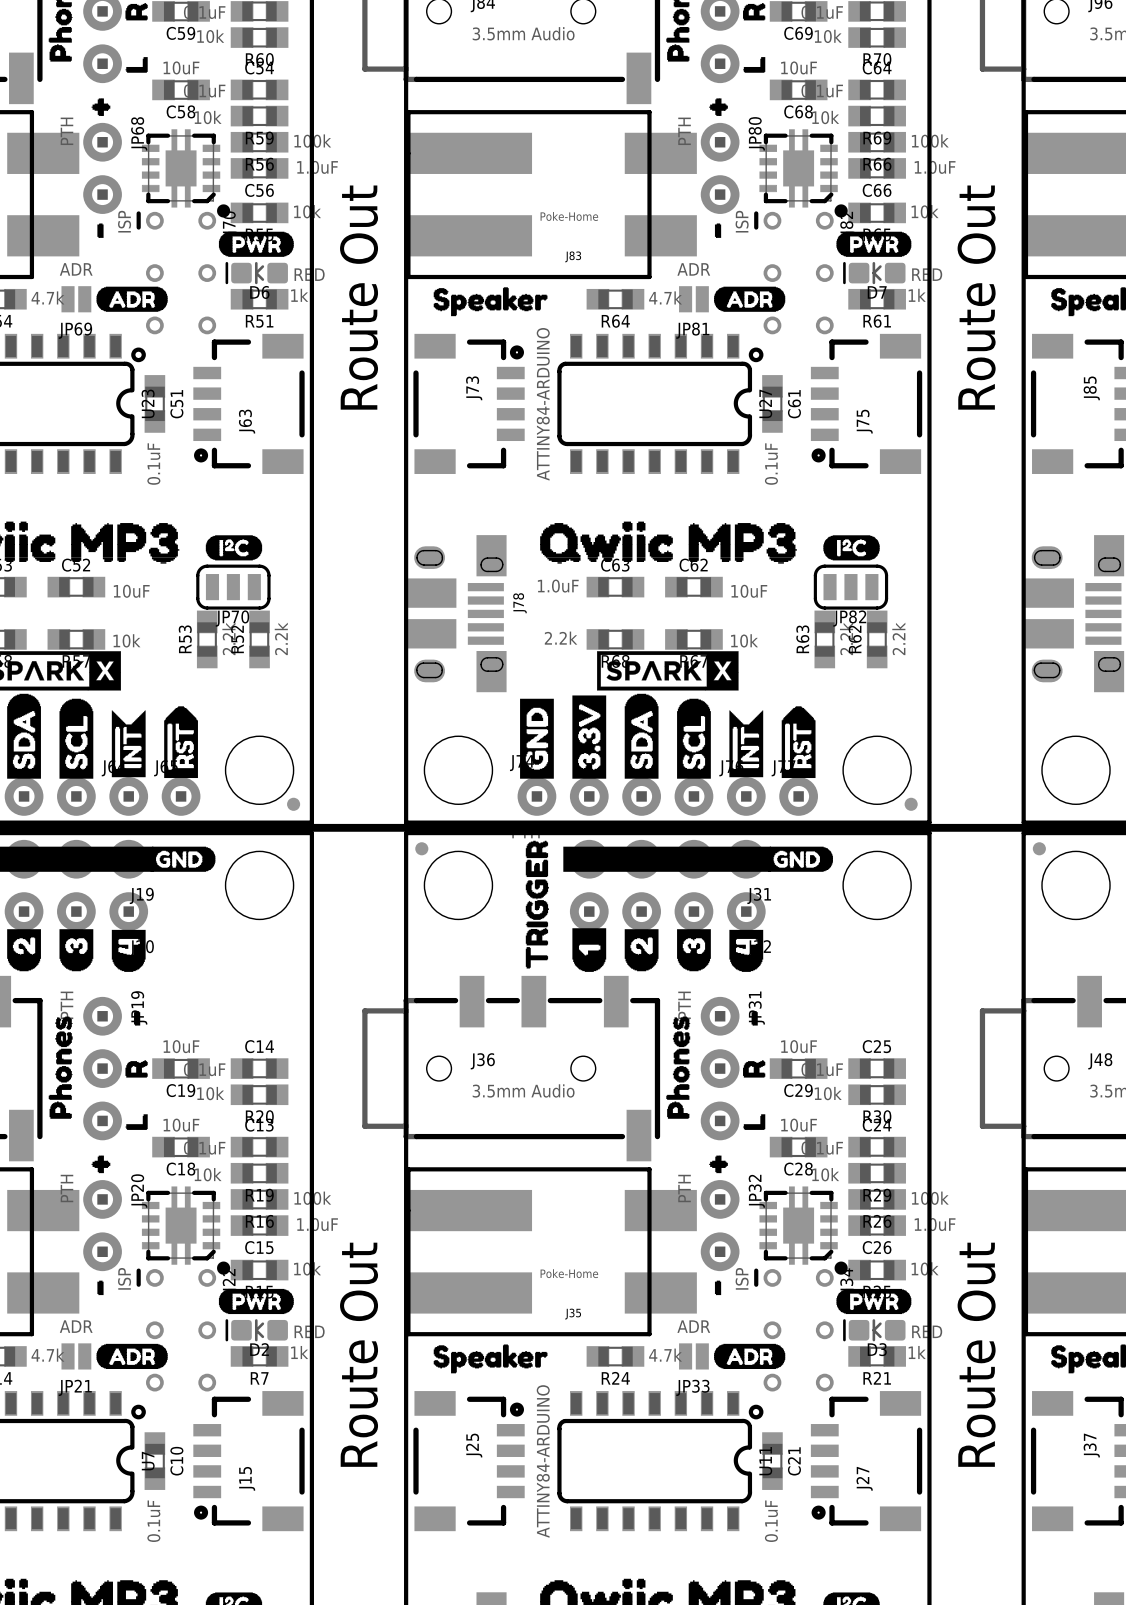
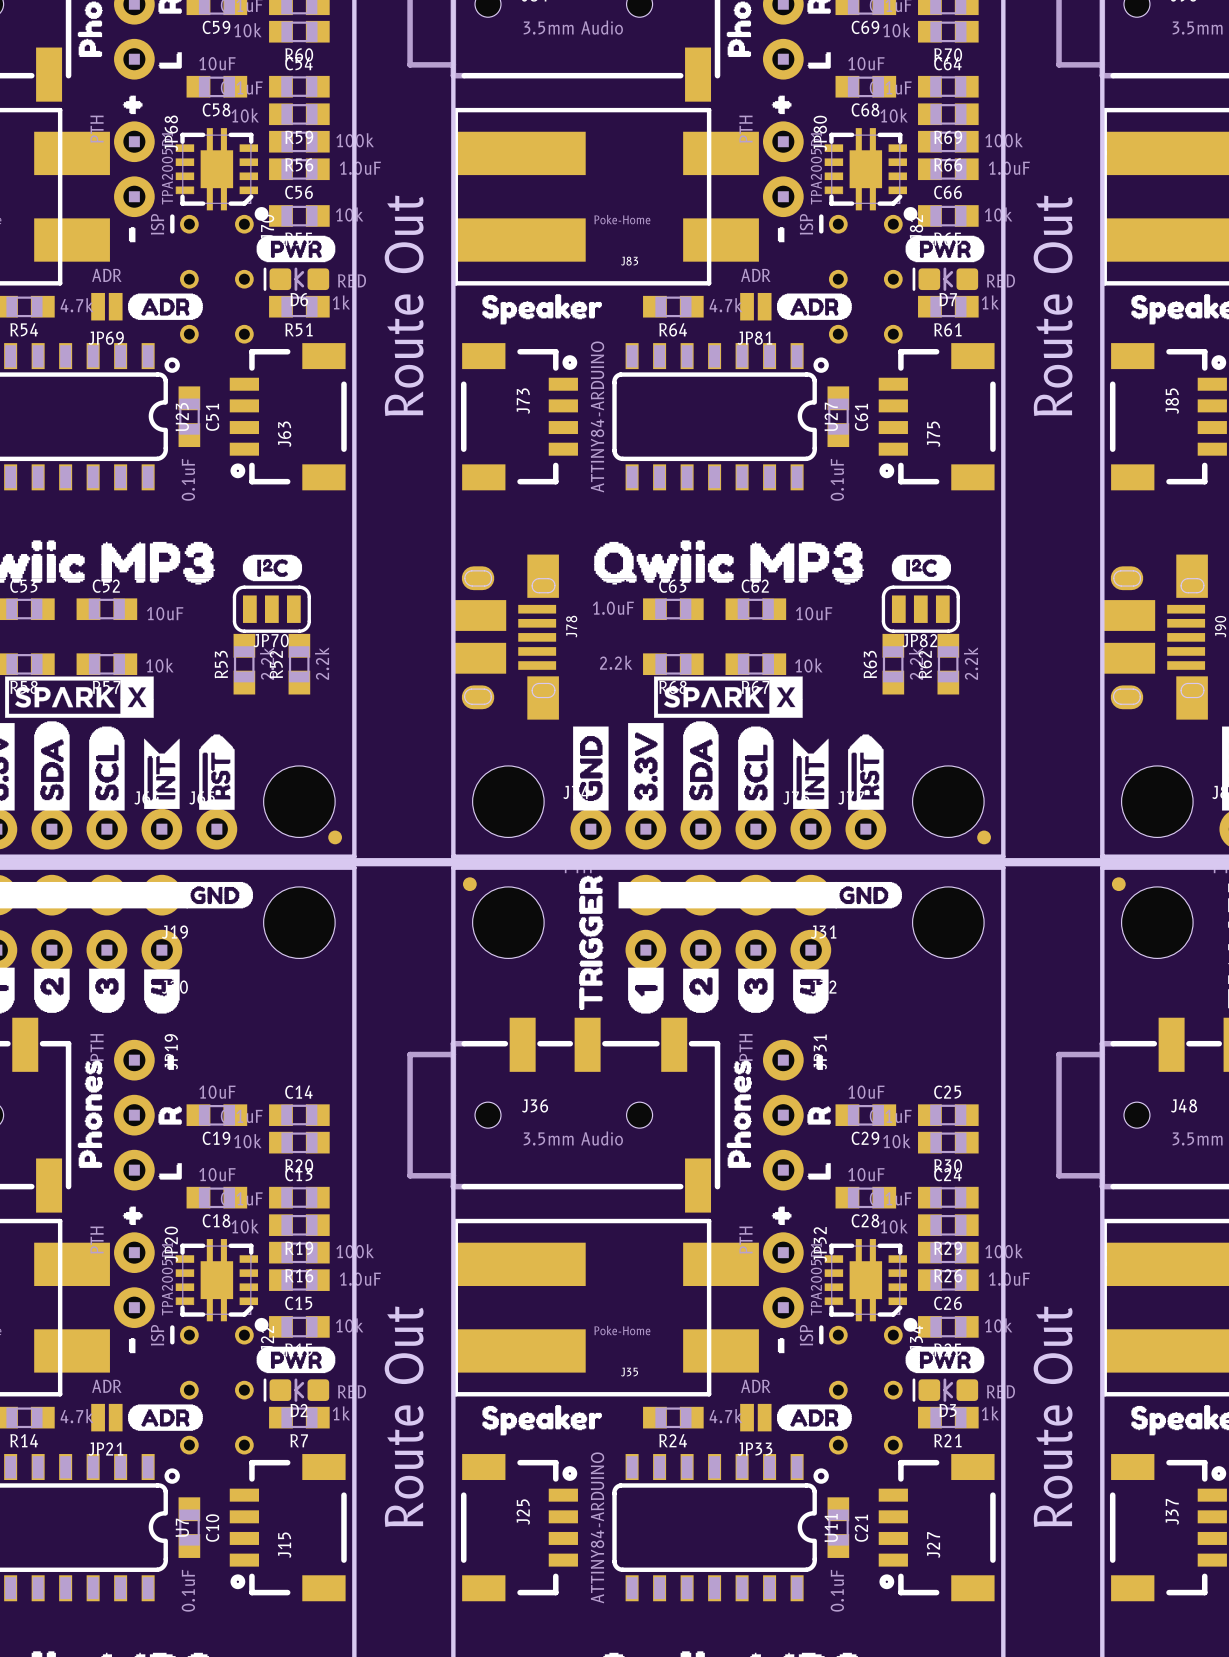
text: none -> TPA2005D1 (167, 168)
text: none -> TPA2005D1 (816, 168)
text: none -> TPA2005D1 (167, 1279)
text: none -> TPA2005D1 (816, 1279)

